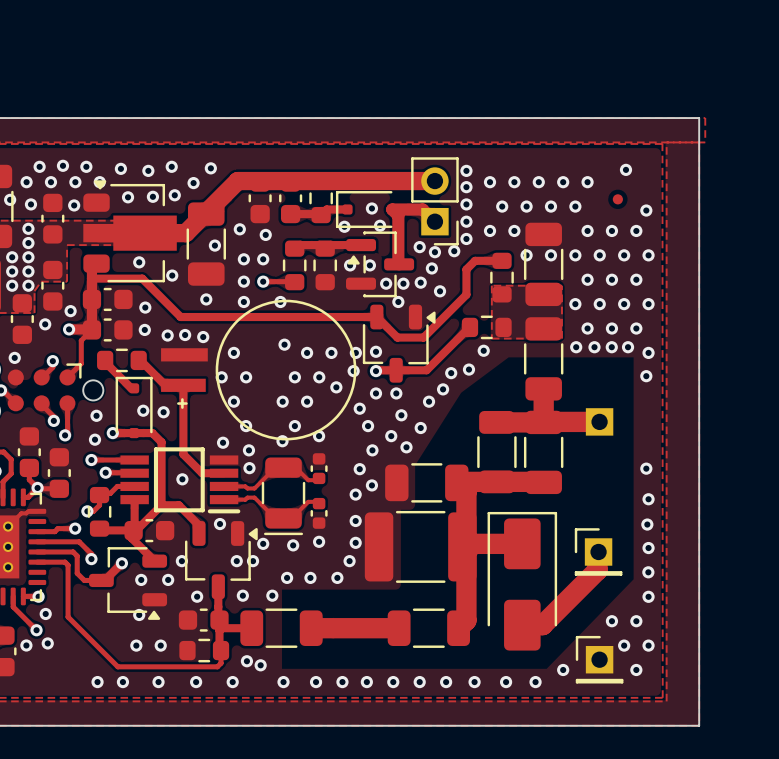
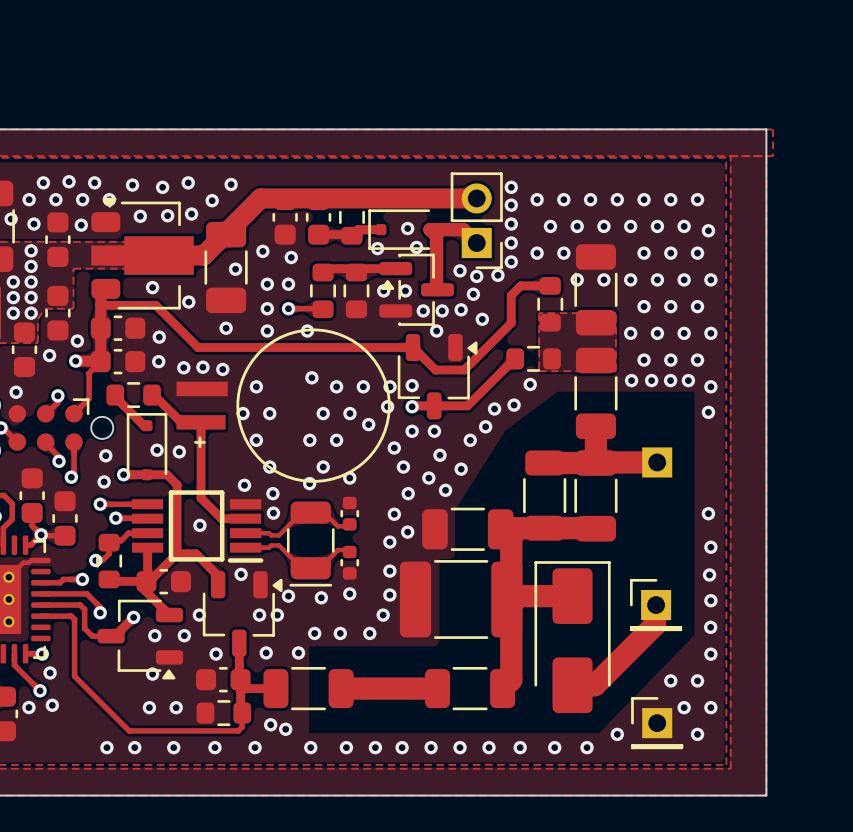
via: (626, 169) -> none
via: none -> (670, 199)
via: none -> (697, 199)
part: (617, 199) -> none
via: none -> (657, 226)
via: none -> (684, 226)

